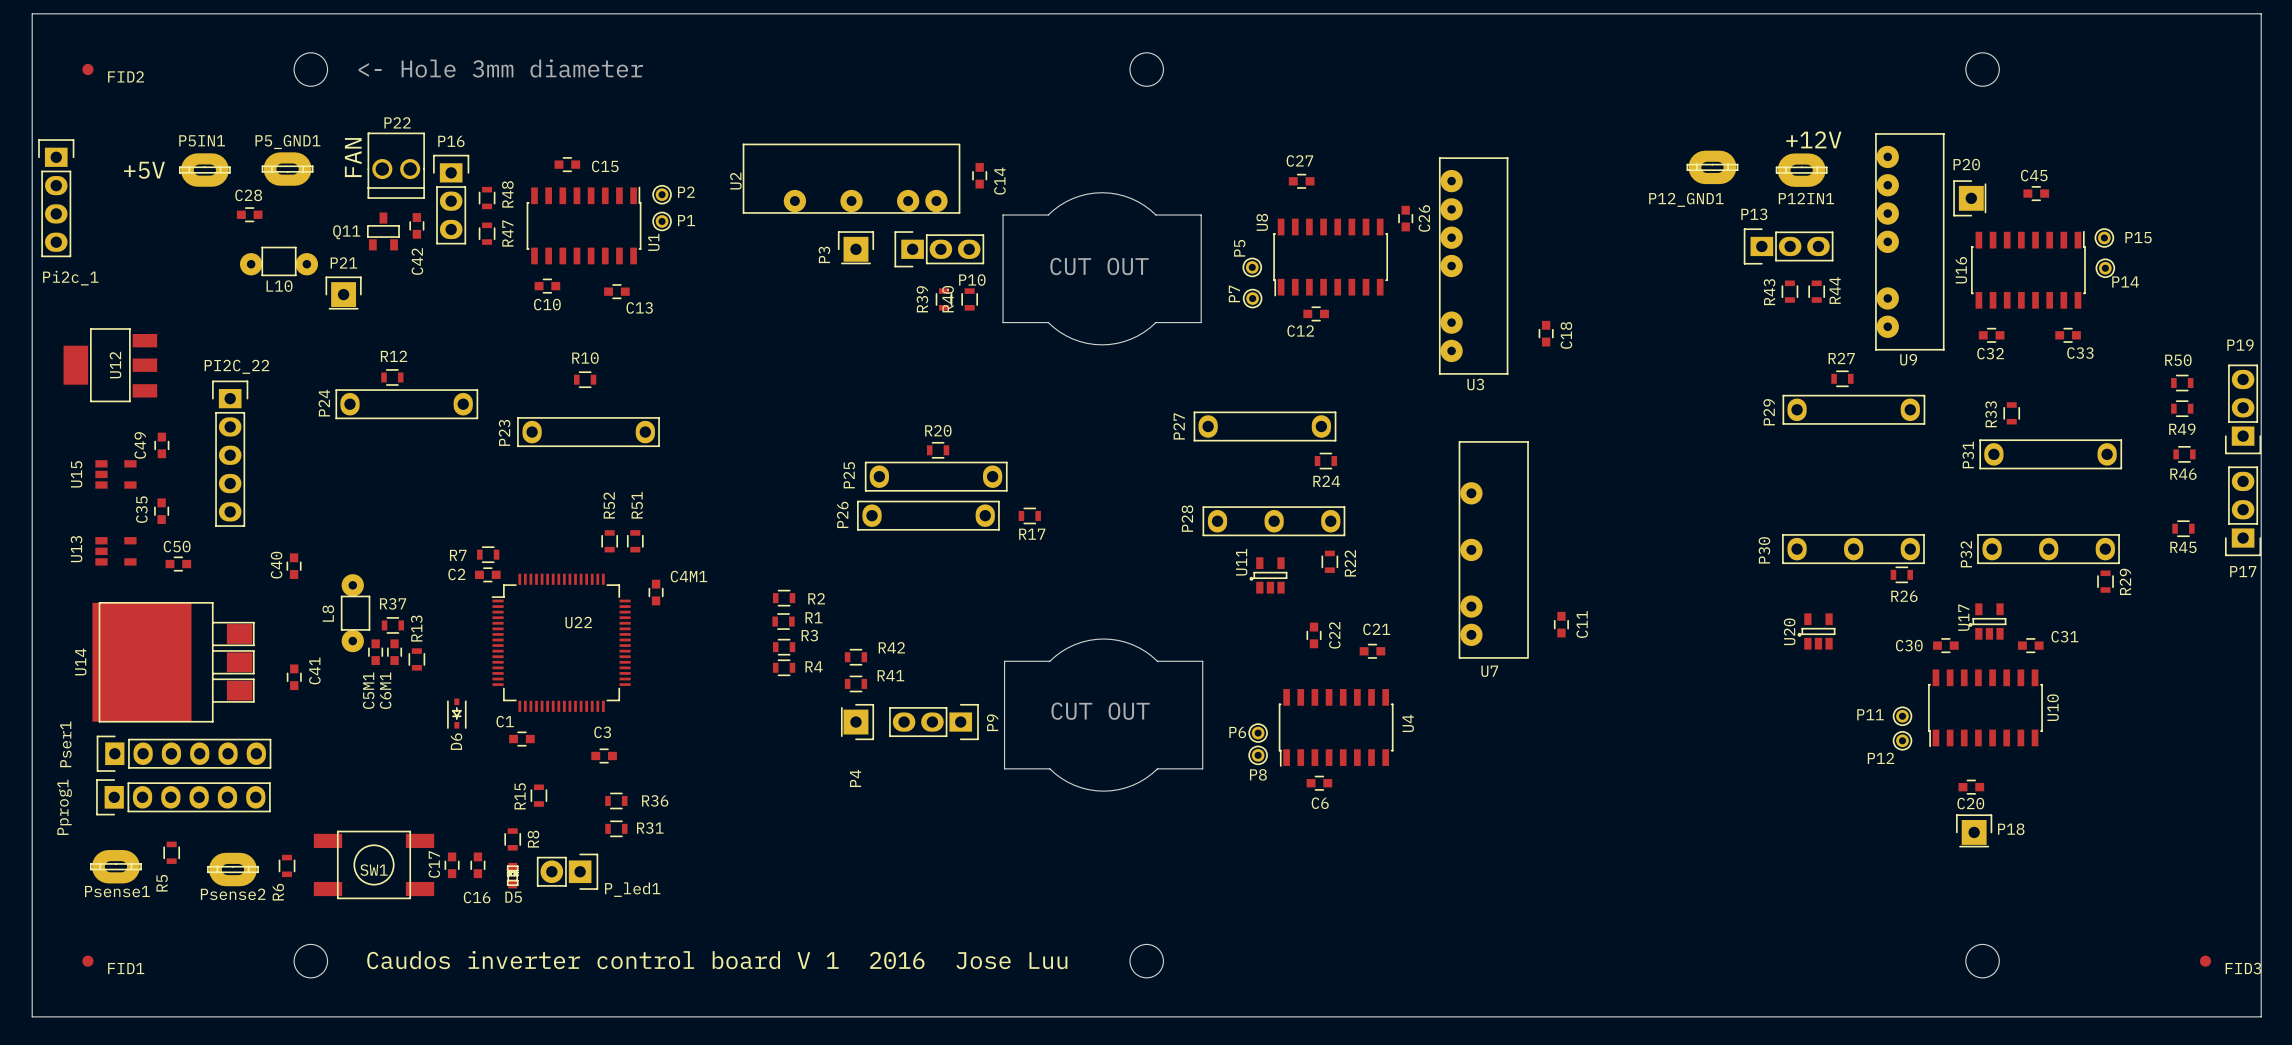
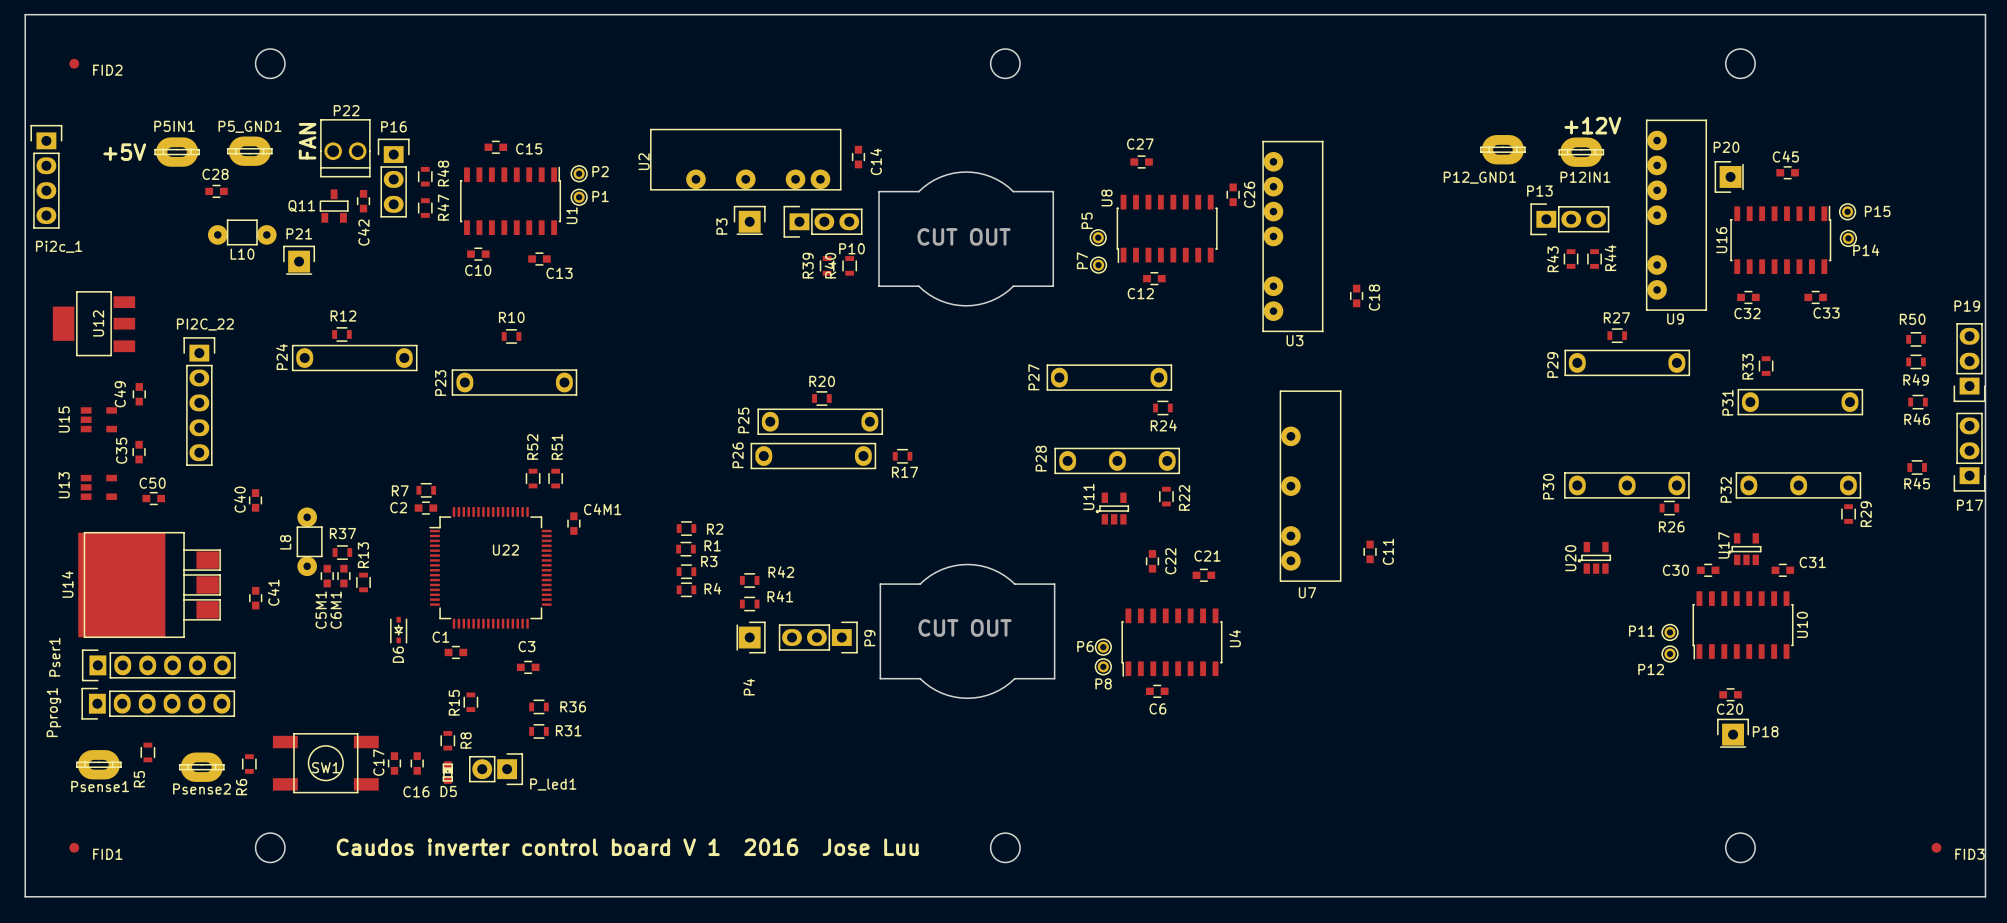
text: <- Hole 3mm diameter (500, 68) -> none

